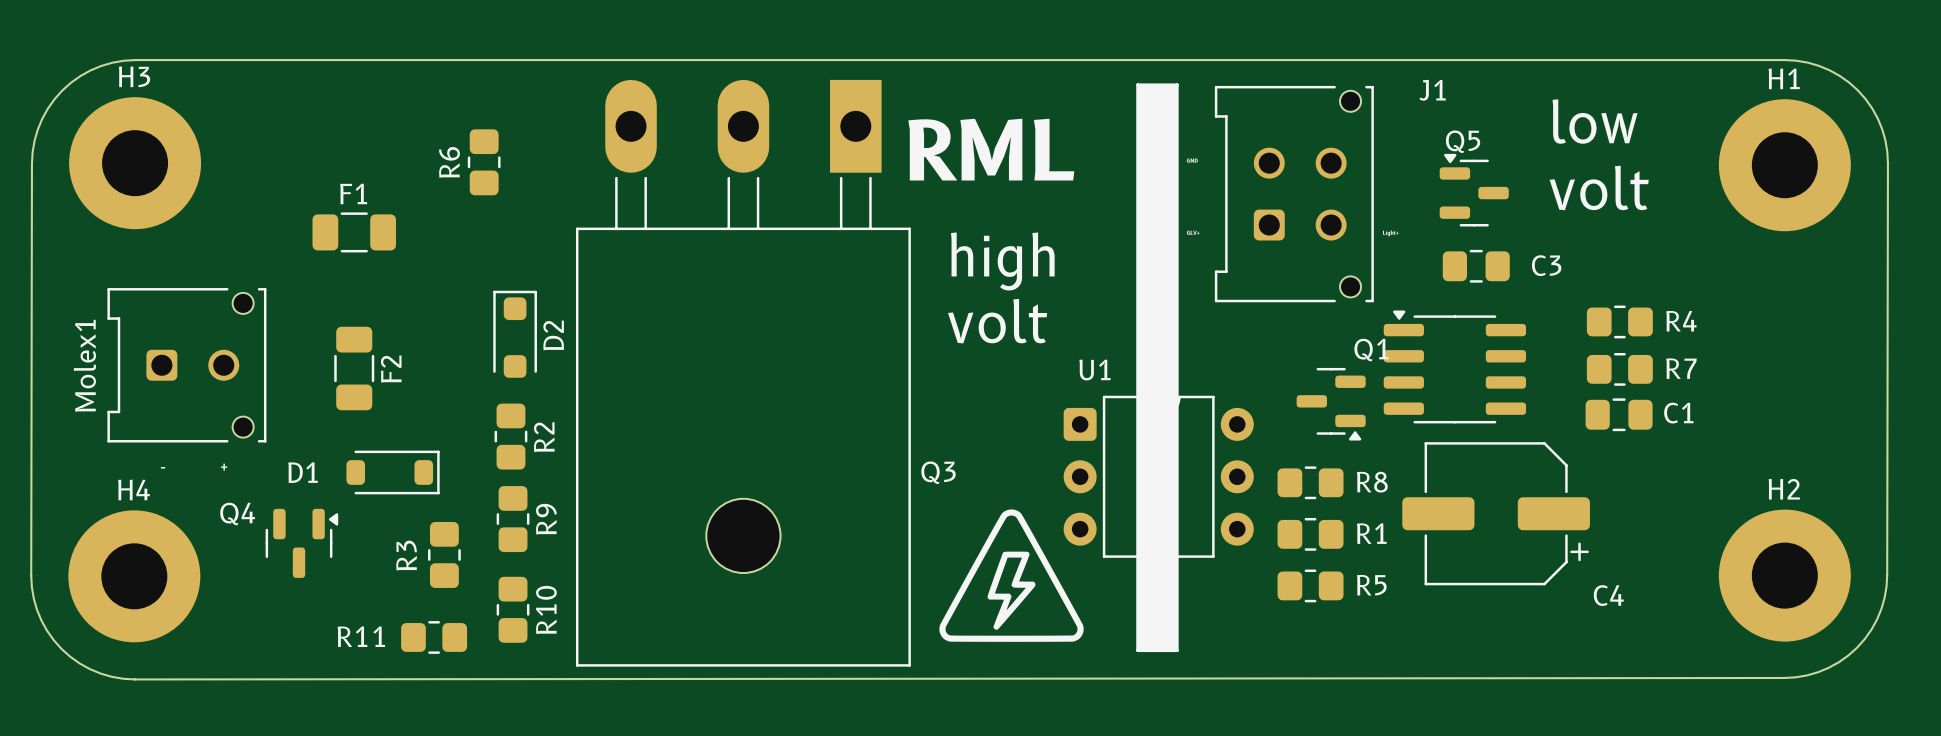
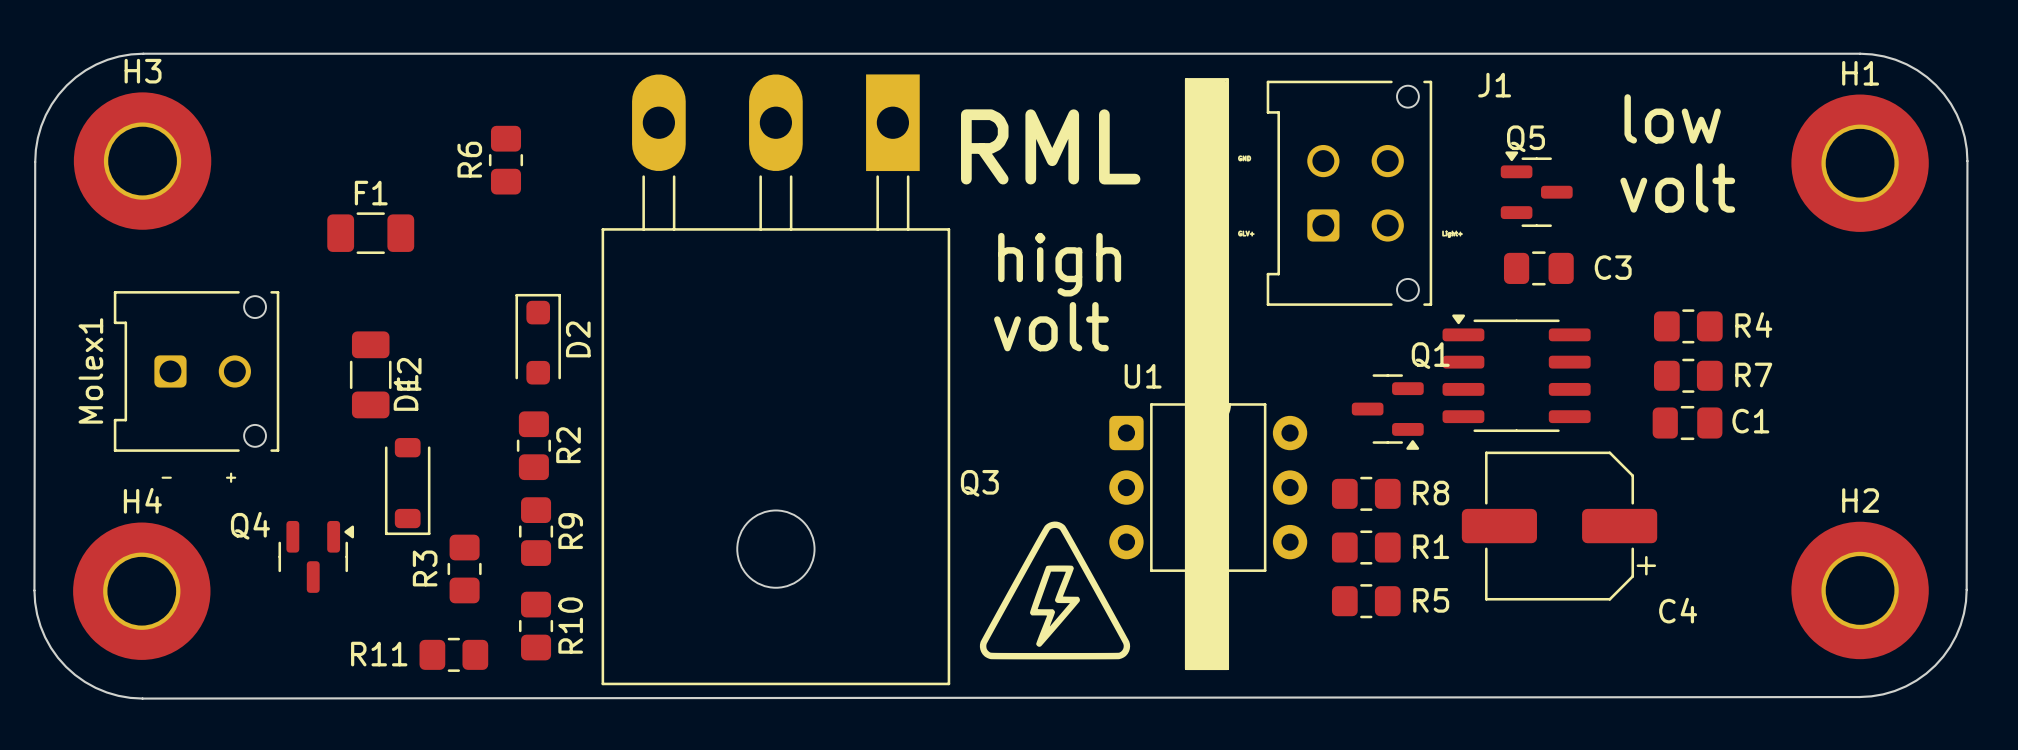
D1 rotation: 0° (393, 472) -> 90° clockwise (407, 486)

